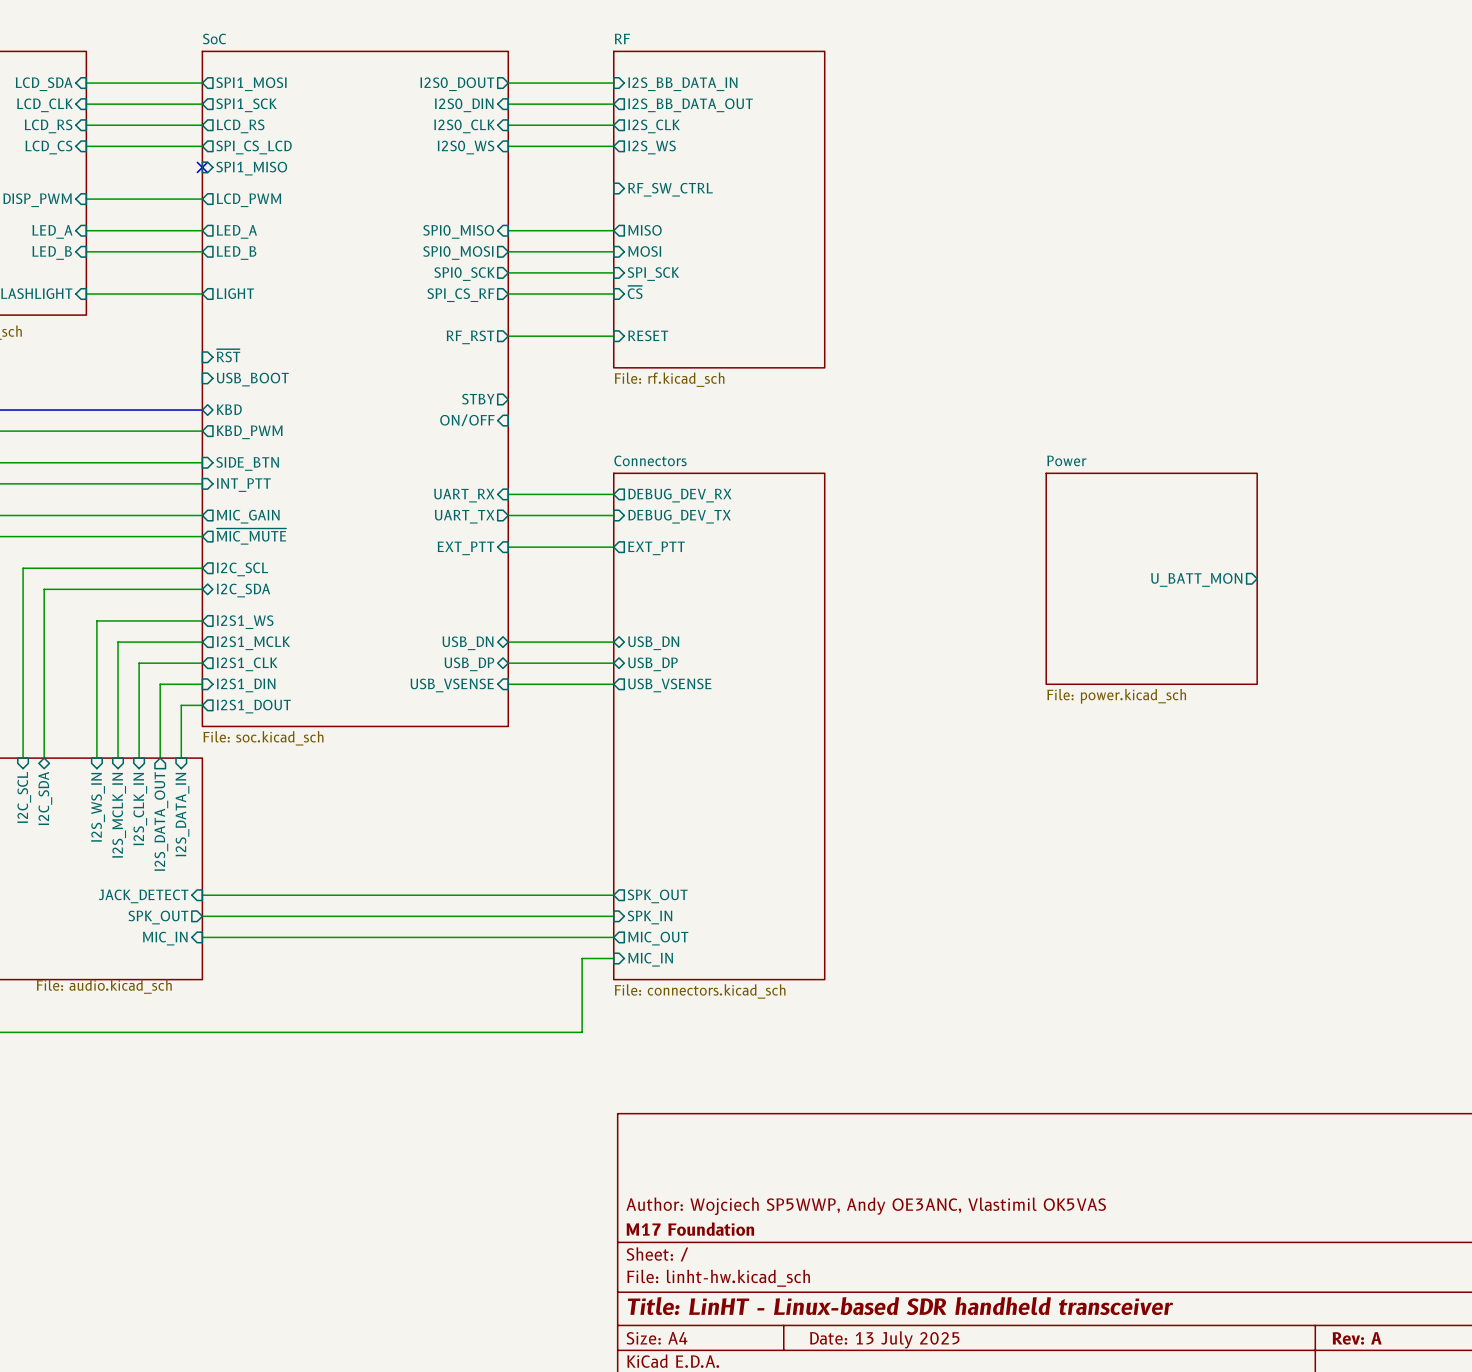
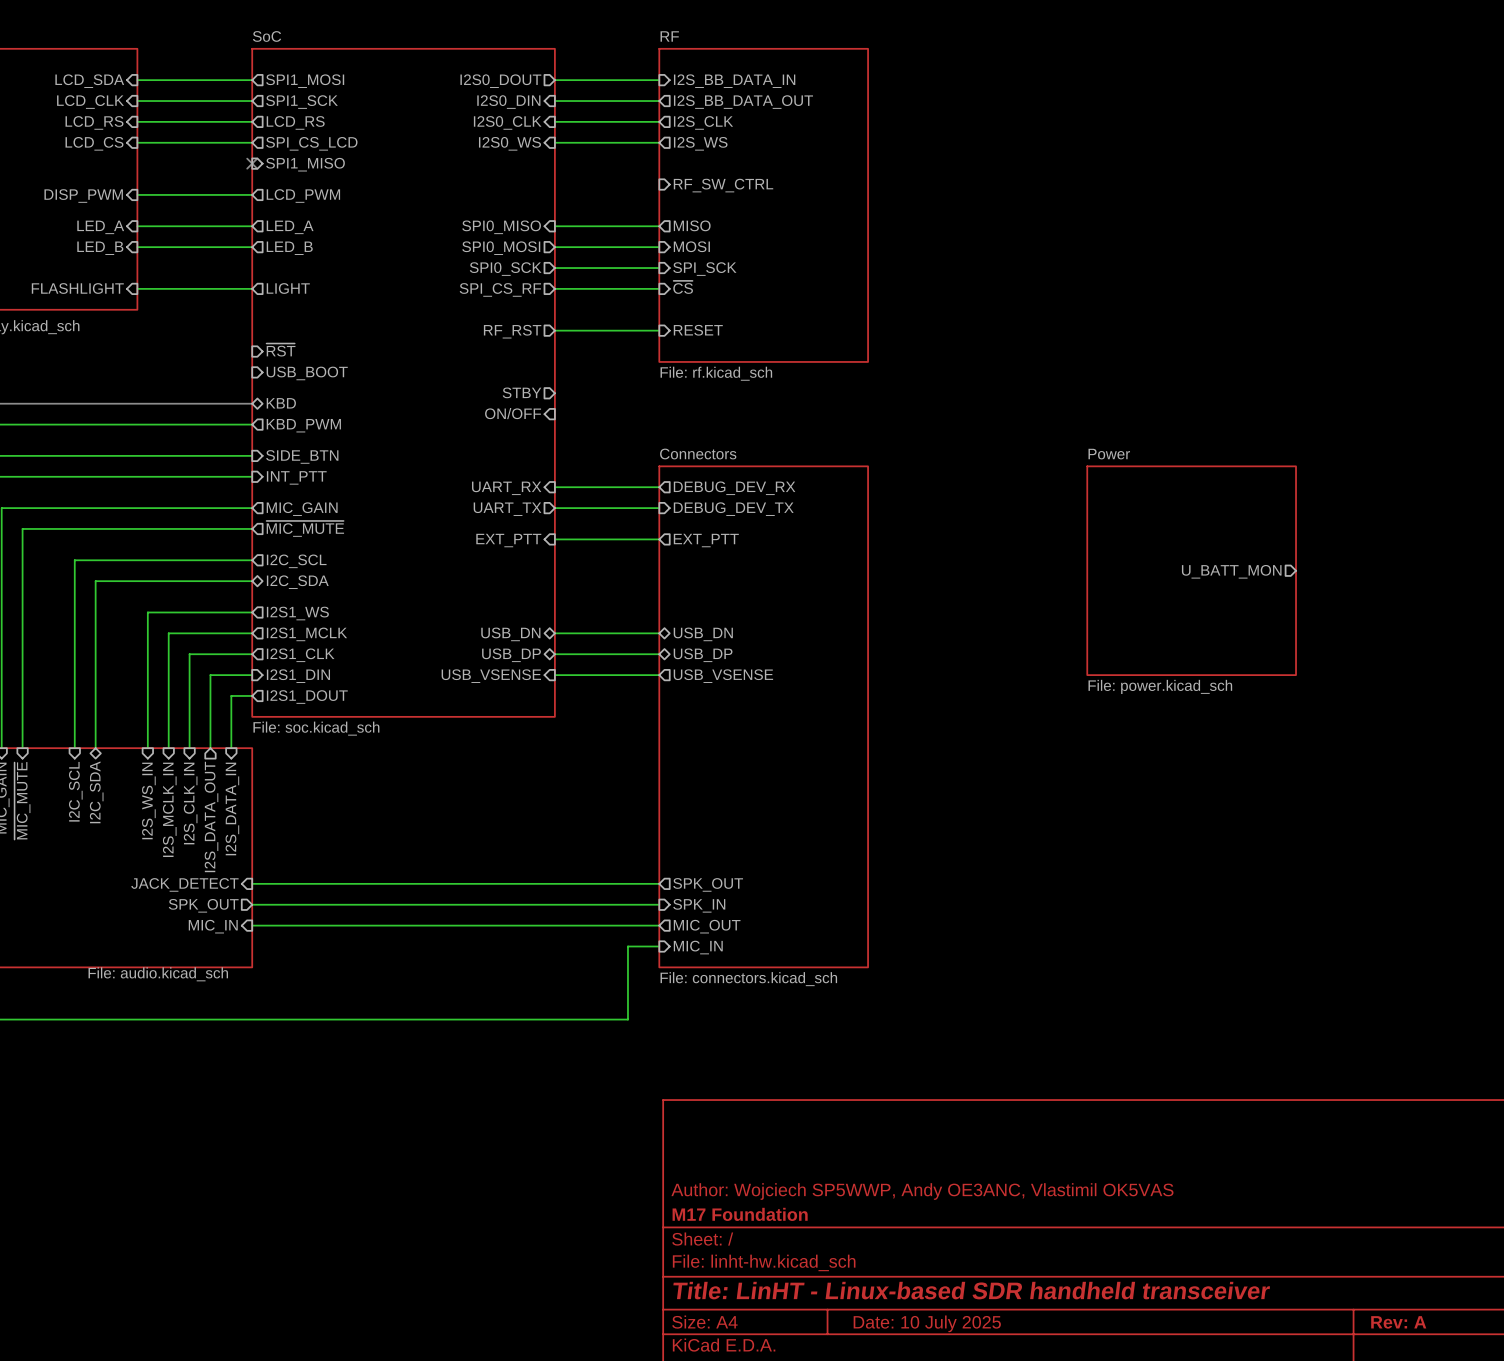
title block: Date: 13 July 2025 (884, 1339) -> Date: 10 July 2025 (927, 1323)

